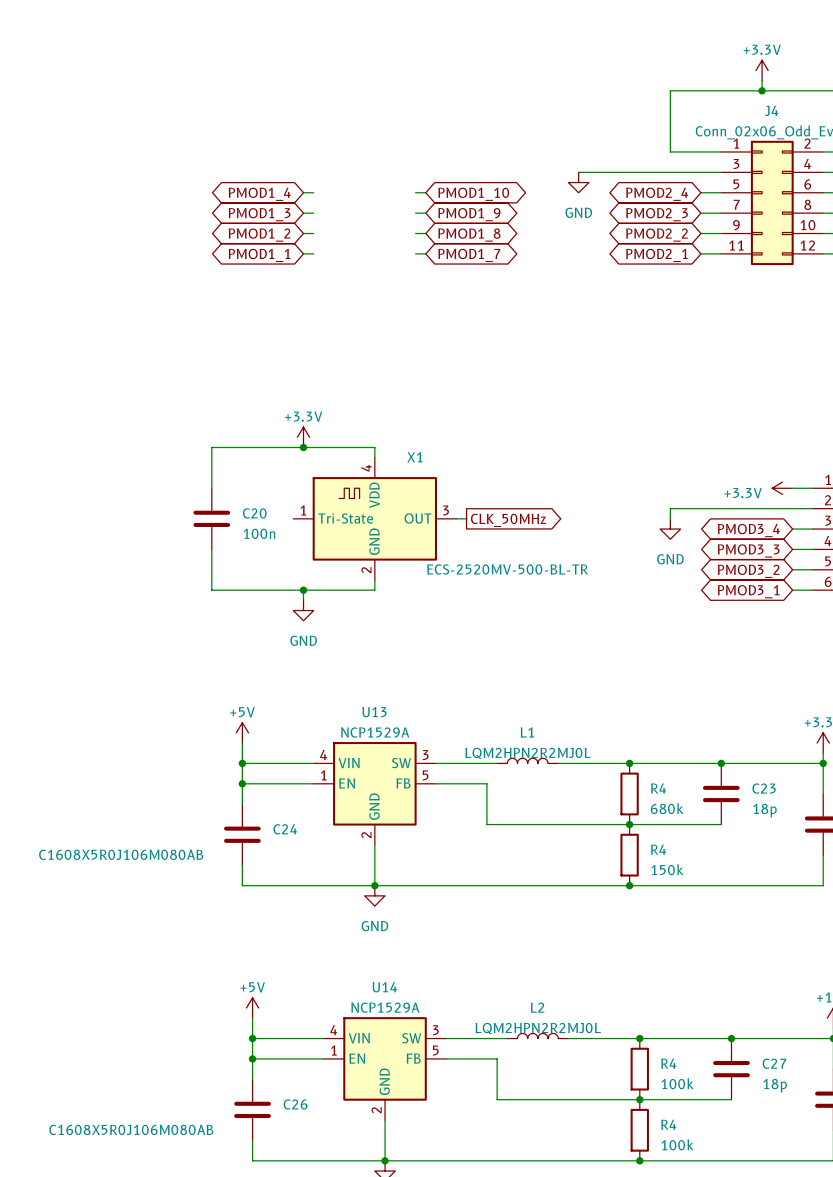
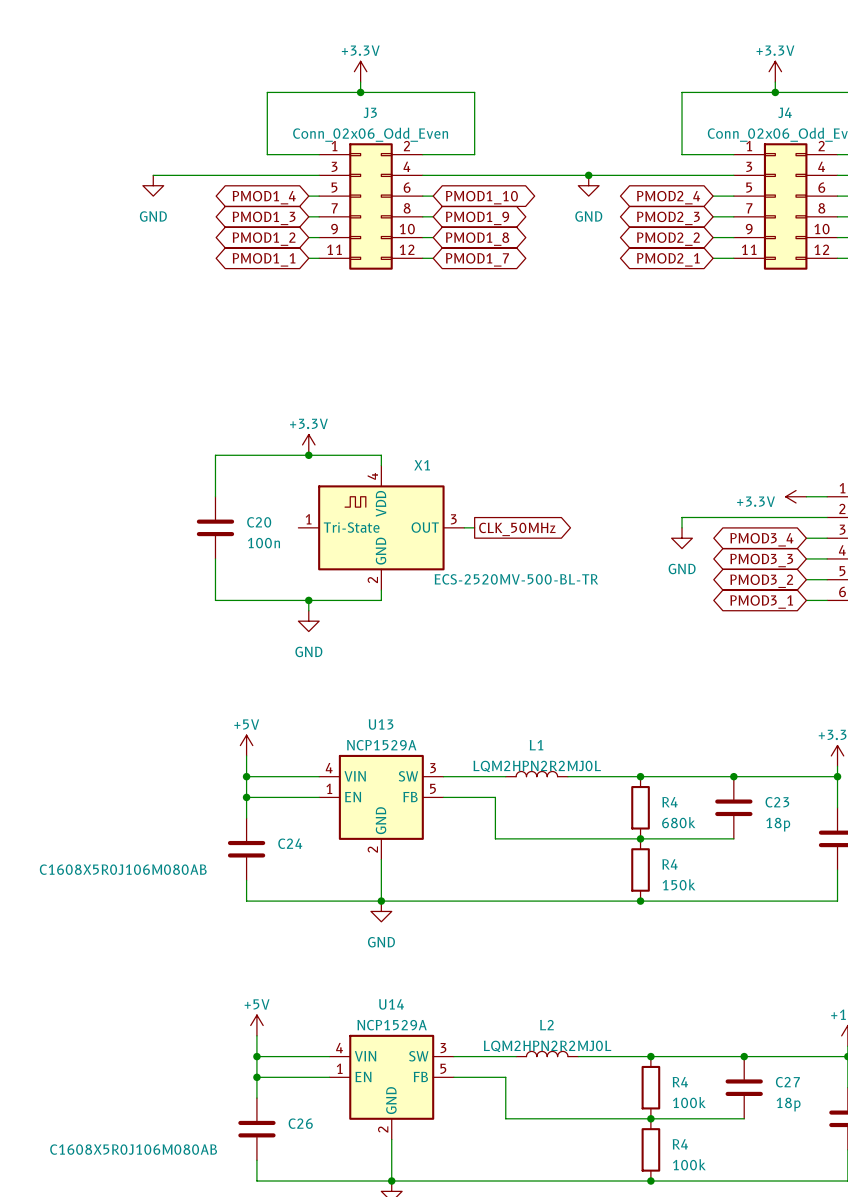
power symbol: none -> +3.3V (360, 71)
wire: none -> (360, 82) (360, 92)
junction: none -> (360, 92)
wire: none -> (319, 154) (267, 154) (267, 92) (474, 92) (474, 154) (422, 154)
wire: none -> (153, 175) (319, 175)
wire: none -> (422, 175) (588, 175)
junction: none -> (588, 175)
power symbol: none -> GND (153, 185)
J3: none -> Conn_02x06_Odd_Even (370, 206)

